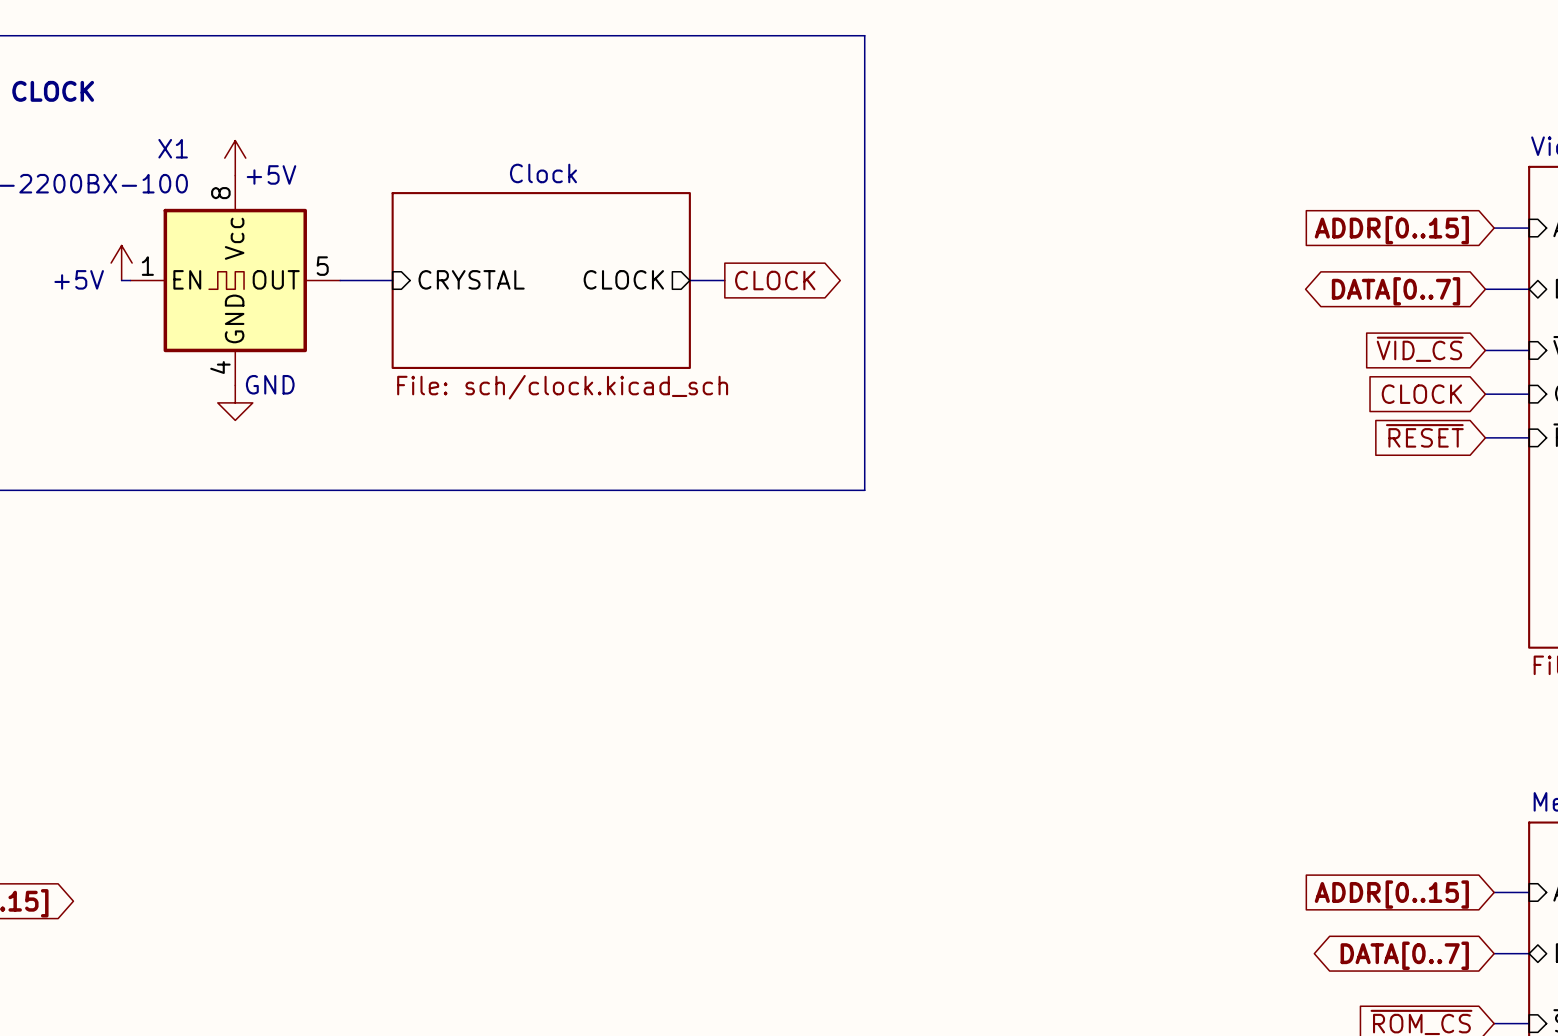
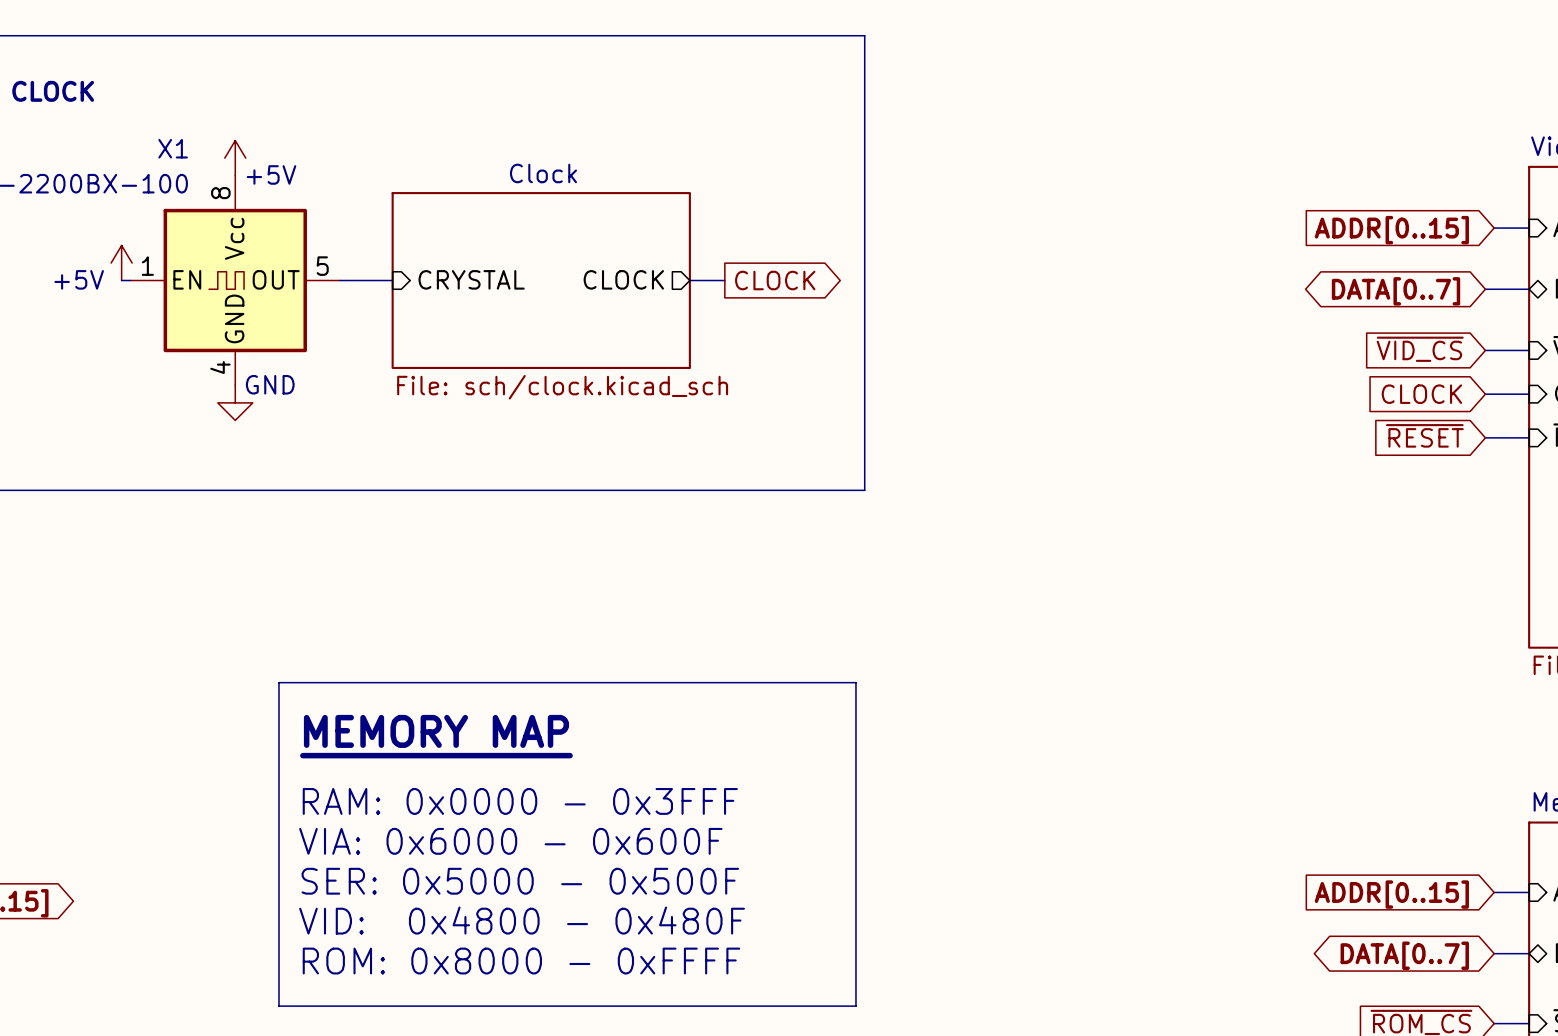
line: none -> (278, 682) (278, 1006) (855, 1006) (855, 682) (278, 682)
text: none -> MEMORY MAP (436, 731)
text: none -> ~{ } (436, 755)
text: none -> RAM: 0x0000 - 0x3FFF (520, 801)
text: none -> VIA: 0x6000 - 0x600F (510, 841)
text: none -> SER: 0x5000 - 0x500F (520, 881)
text: none -> VID: 0x4800 - 0x480F (522, 920)
text: none -> ROM: 0x8000 - 0xFFFF (521, 961)

